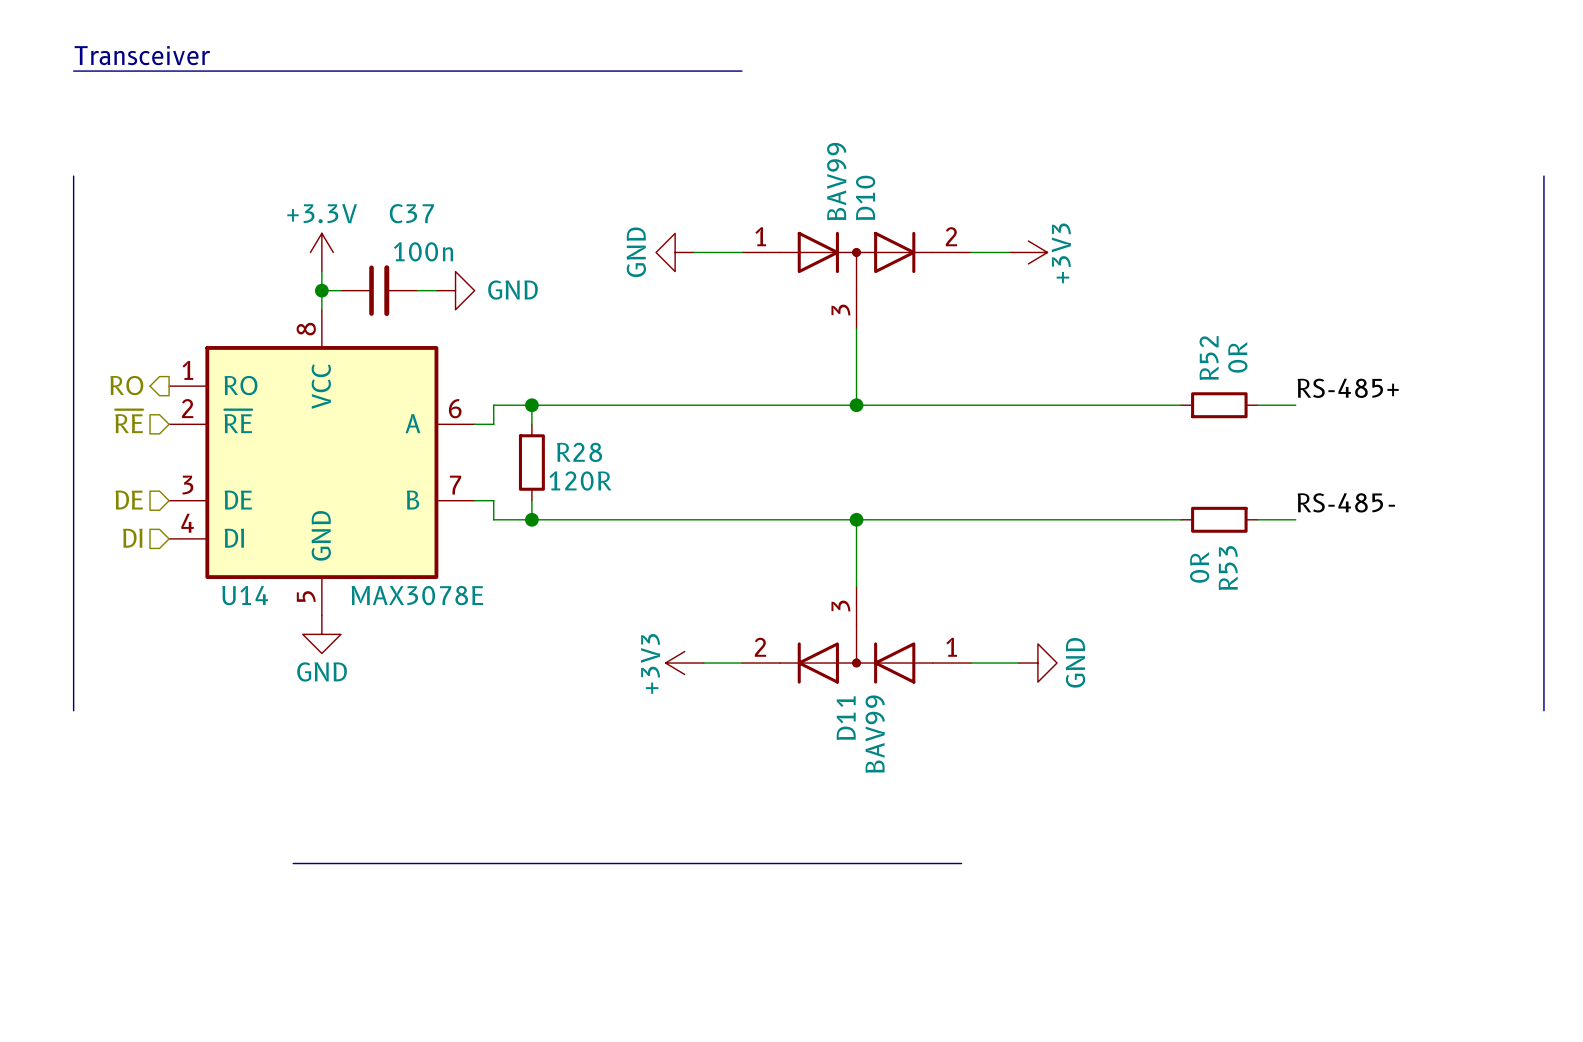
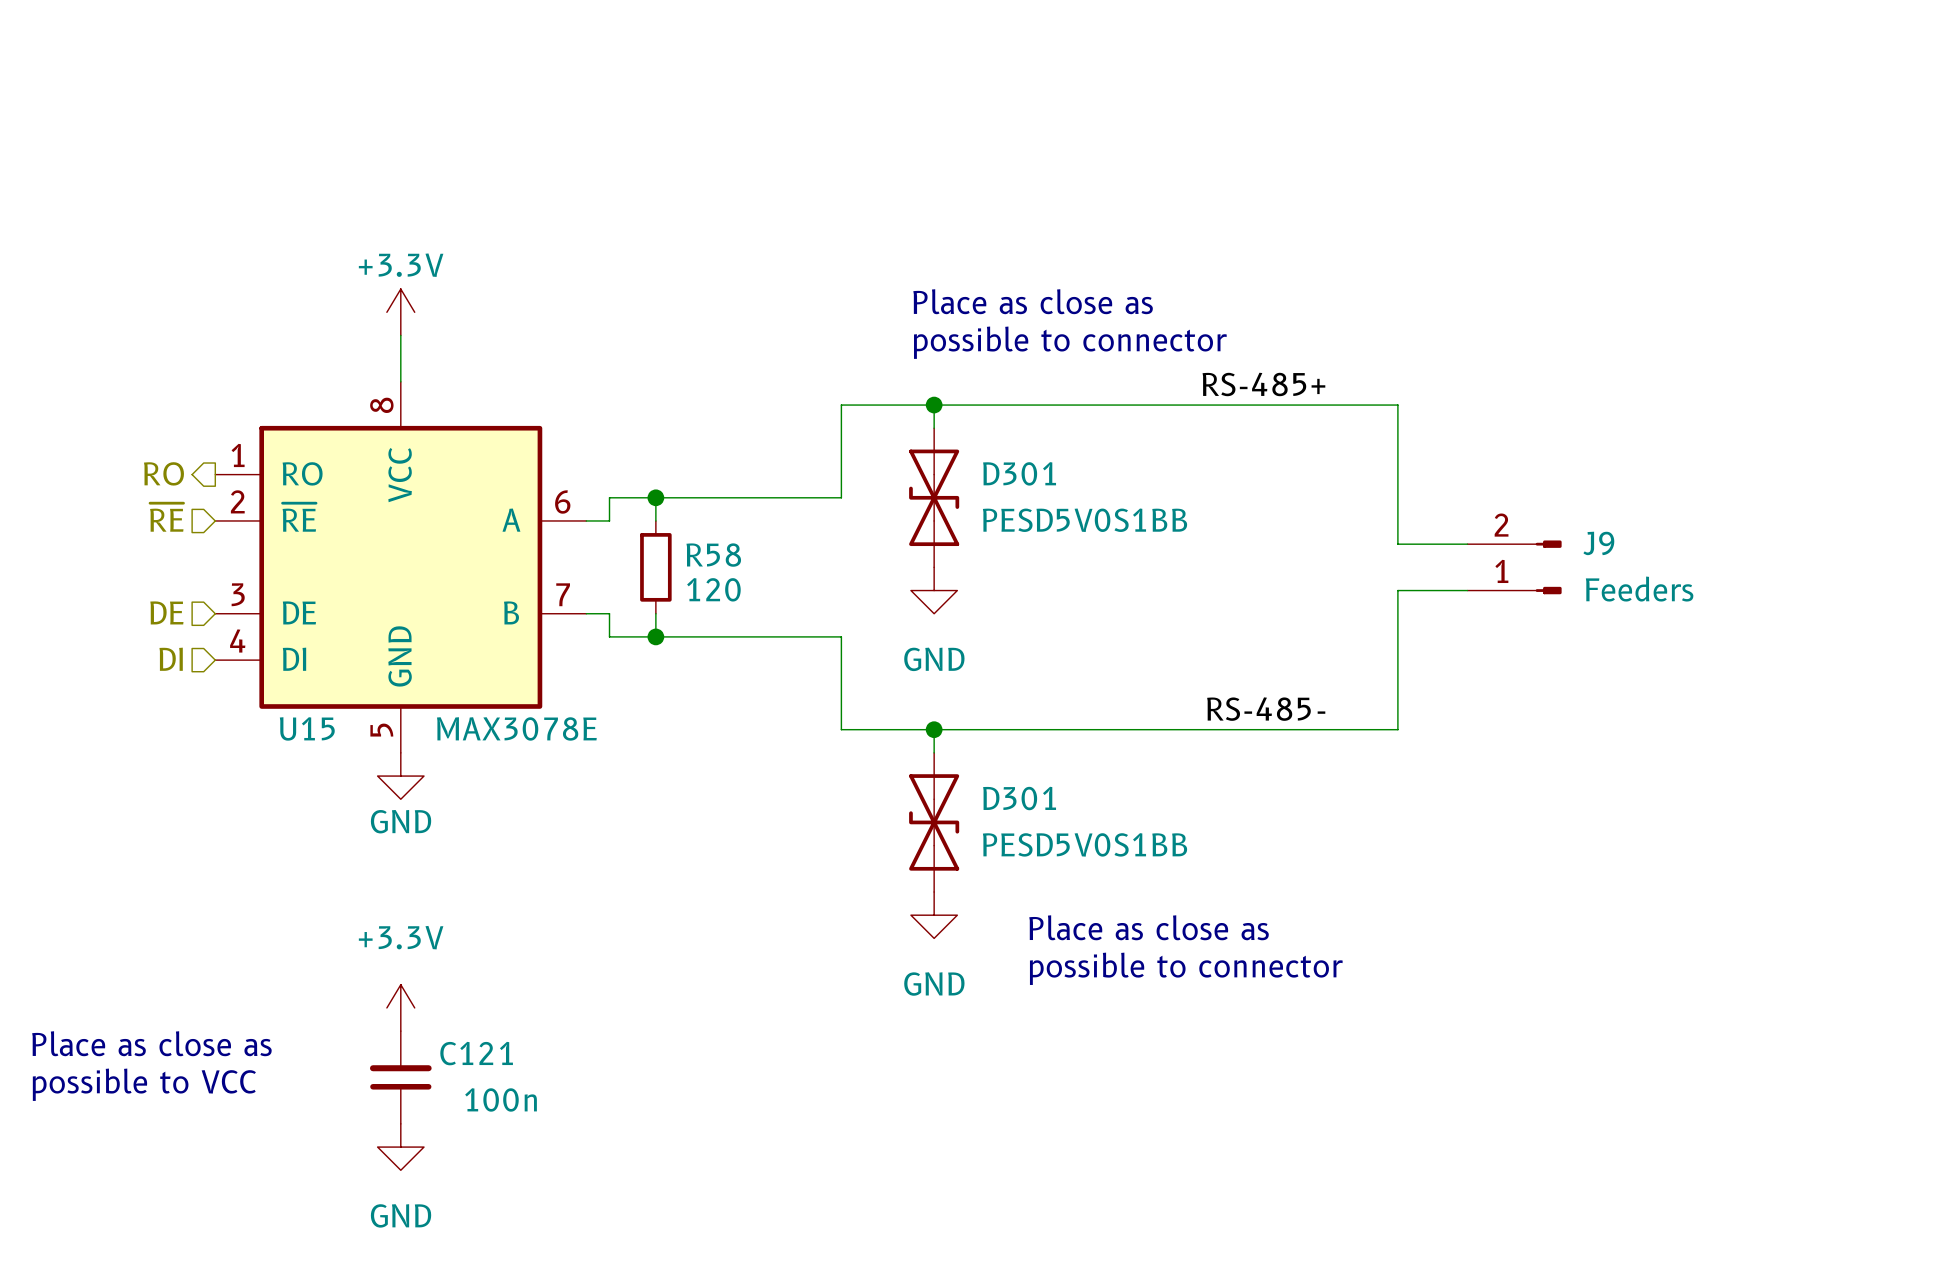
text: Transceiver (142, 55) -> none
line: (73, 71) (741, 71) -> none
line: (73, 176) (73, 710) -> none
line: (1543, 176) (1543, 710) -> none
text: none -> Place as close as (1033, 301)
power symbol: GND (675, 252) -> none
wire: (694, 252) (741, 252) -> none
wire: (971, 252) (1009, 252) -> none
power symbol: +3V3 (1028, 252) -> none
text: none -> possible to connector (1070, 342)
D10: BAV99 (856, 280) -> none
wire: (321, 290) (340, 290) -> none
junction: (321, 290) -> none
C37: 100n (379, 290) -> none
wire: (417, 290) (436, 290) -> none
power symbol: GND (455, 290) -> none
wire: none -> (934, 405) (934, 428)
junction: none -> (934, 405)
wire: (856, 328) (856, 405) -> none
label position: RS-485+ (1348, 388) -> RS-485+ (1263, 384)
wire: (684, 405) (1181, 405) -> (841, 497) (841, 405) (1397, 405) (1397, 544) (1467, 544)
D301: none -> PESD5V0S1BB (934, 497)
junction: (856, 405) -> none
R52: 0R (1219, 405) -> none
wire: (1257, 405) (1295, 405) -> none
R28 name: R28 (579, 452) -> R58 (713, 555)
J9: none -> Feeders (1514, 567)
R28 value: 120R (580, 481) -> 120 (713, 589)
power symbol: none -> GND (934, 590)
label position: RS-485- (1346, 502) -> RS-485- (1266, 709)
wire: (684, 519) (1181, 519) -> (841, 636) (841, 729) (1397, 729) (1397, 590) (1467, 590)
wire: (856, 519) (856, 586) -> none
junction: (856, 519) -> none
R53: 0R (1219, 519) -> none
wire: (1257, 519) (1295, 519) -> none
U14 name: U14 (245, 595) -> U15 (307, 728)
wire: none -> (934, 729) (934, 752)
junction: none -> (934, 729)
D11: BAV99 (856, 635) -> none
power symbol: +3V3 (684, 663) -> none
wire: (703, 663) (741, 663) -> none
wire: (971, 663) (1018, 663) -> none
power symbol: GND (1037, 663) -> none
D301: none -> PESD5V0S1BB (934, 822)
power symbol: none -> GND (934, 915)
text: none -> Place as close as (1149, 927)
text: none -> possible to connector (1186, 968)
power symbol: none -> +3.3V (400, 1007)
text: none -> Place as close as (151, 1043)
line: (293, 863) (961, 863) -> none
C121: none -> 100n (400, 1077)
text: none -> possible to VCC (144, 1084)
power symbol: none -> GND (400, 1147)

